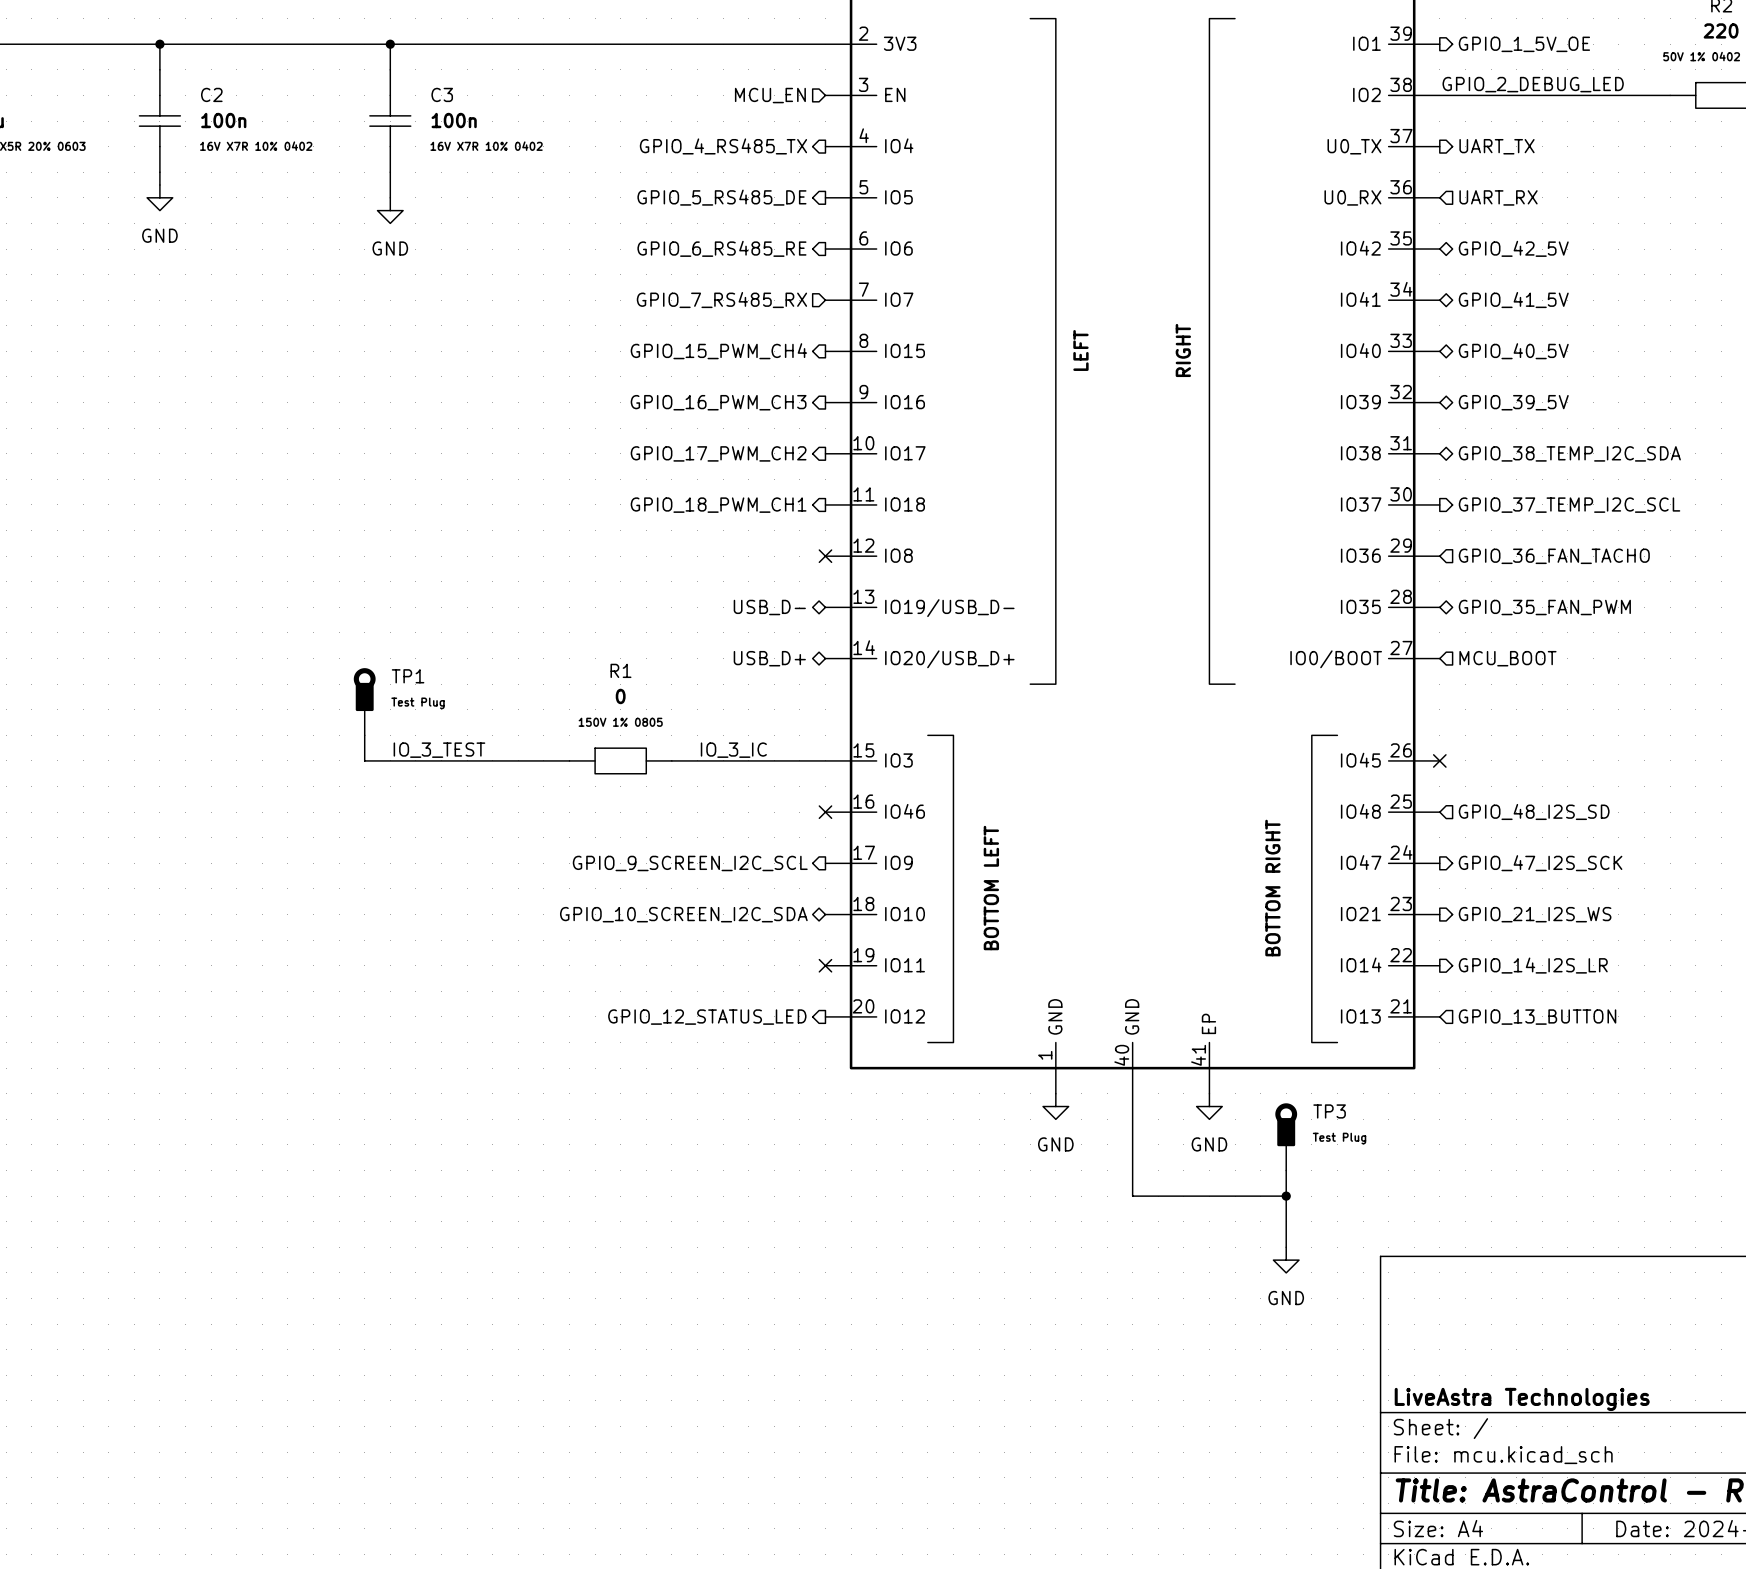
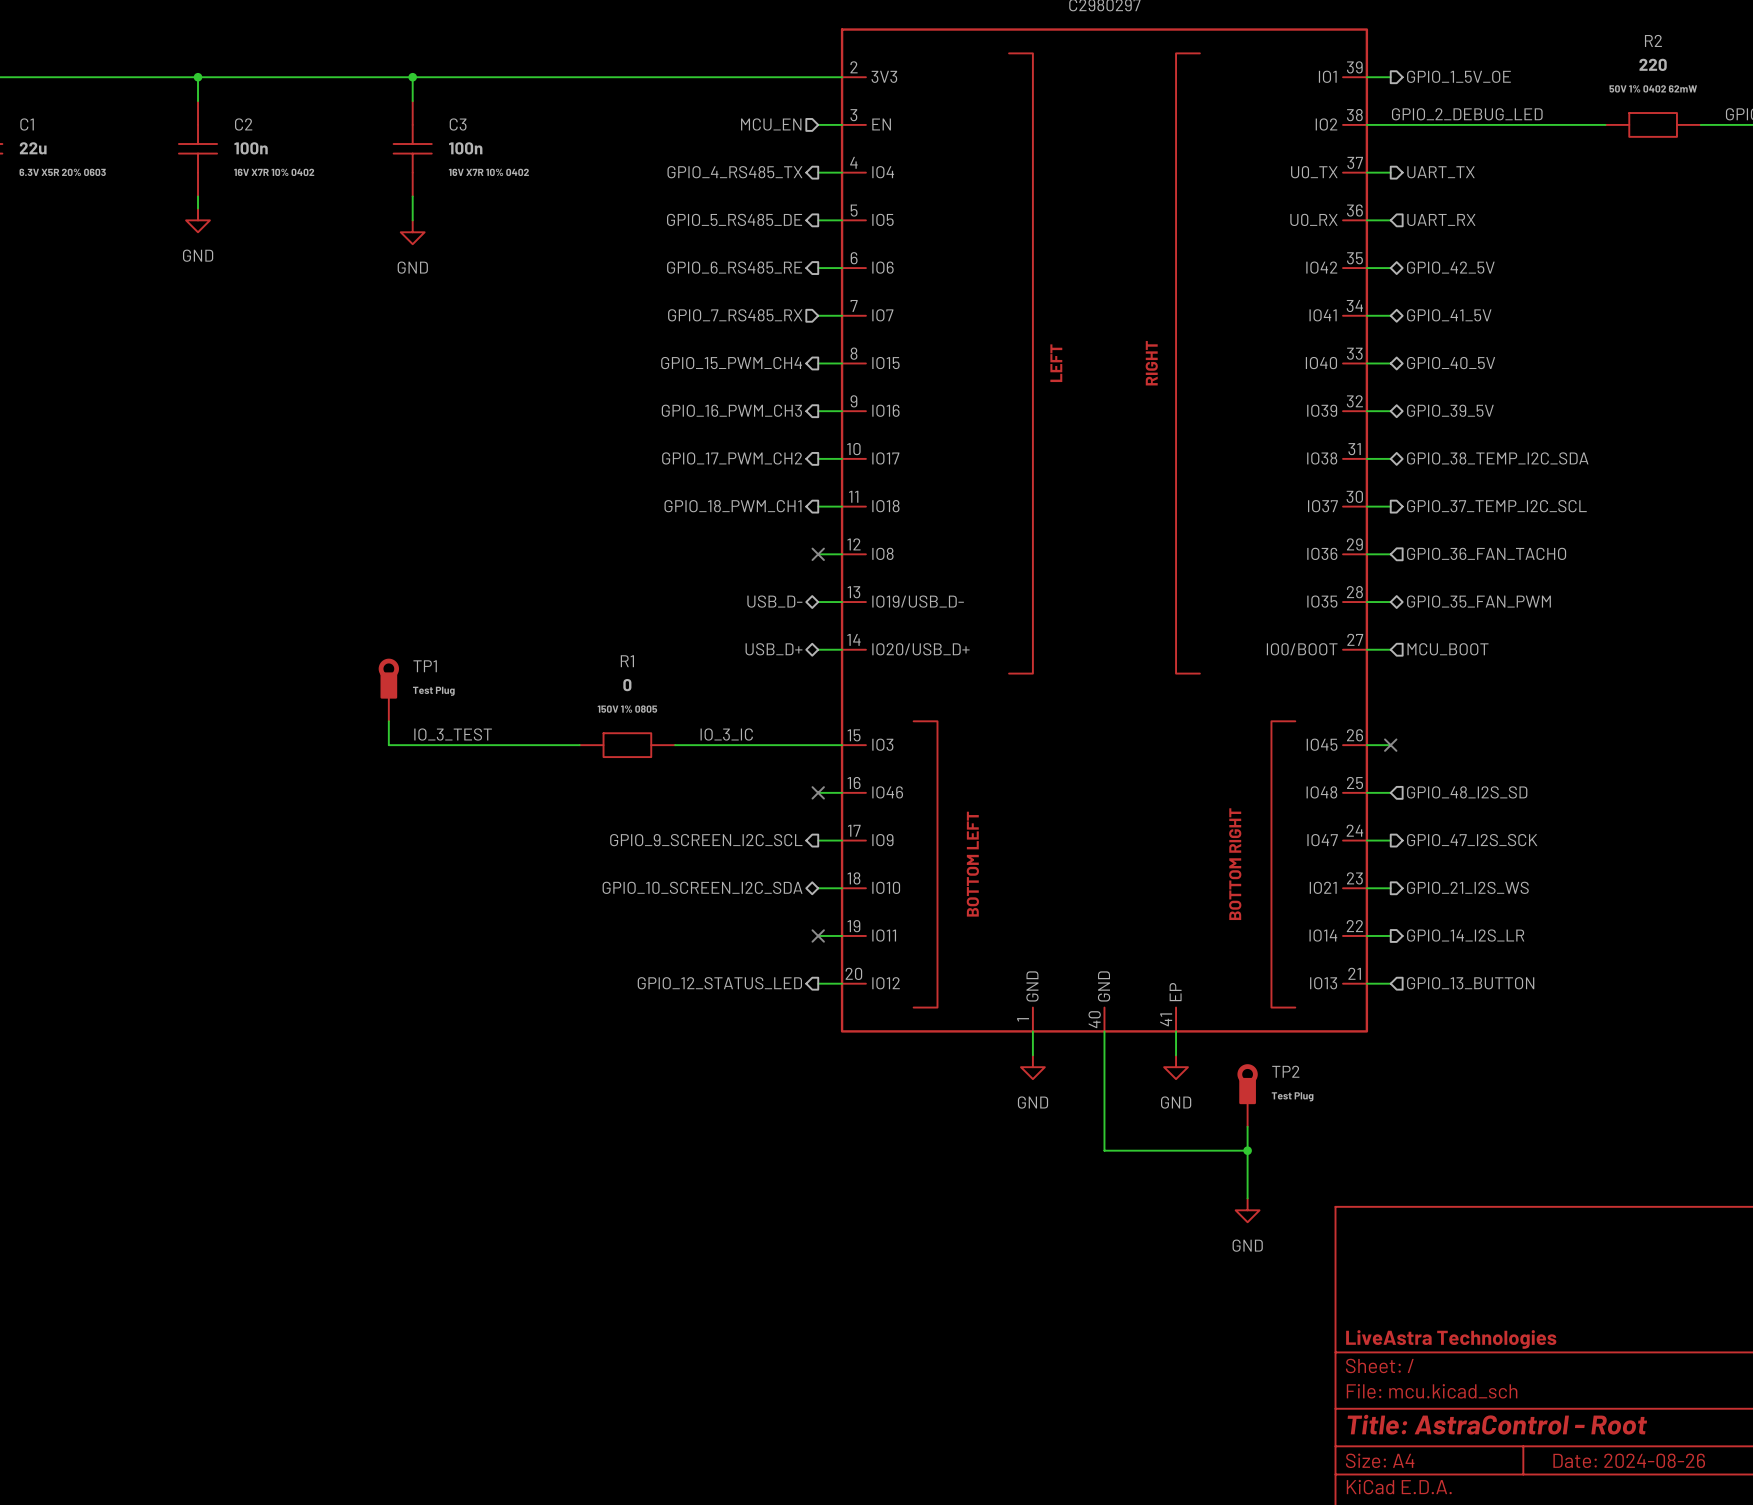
TP3 name: TP3 (1329, 1111) -> TP2 (1285, 1071)

